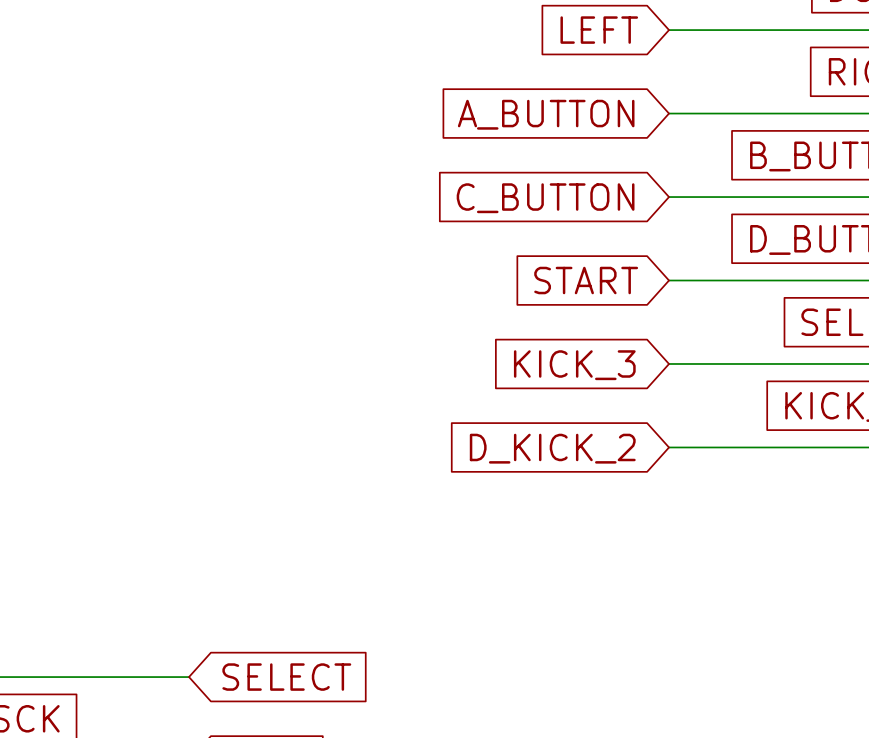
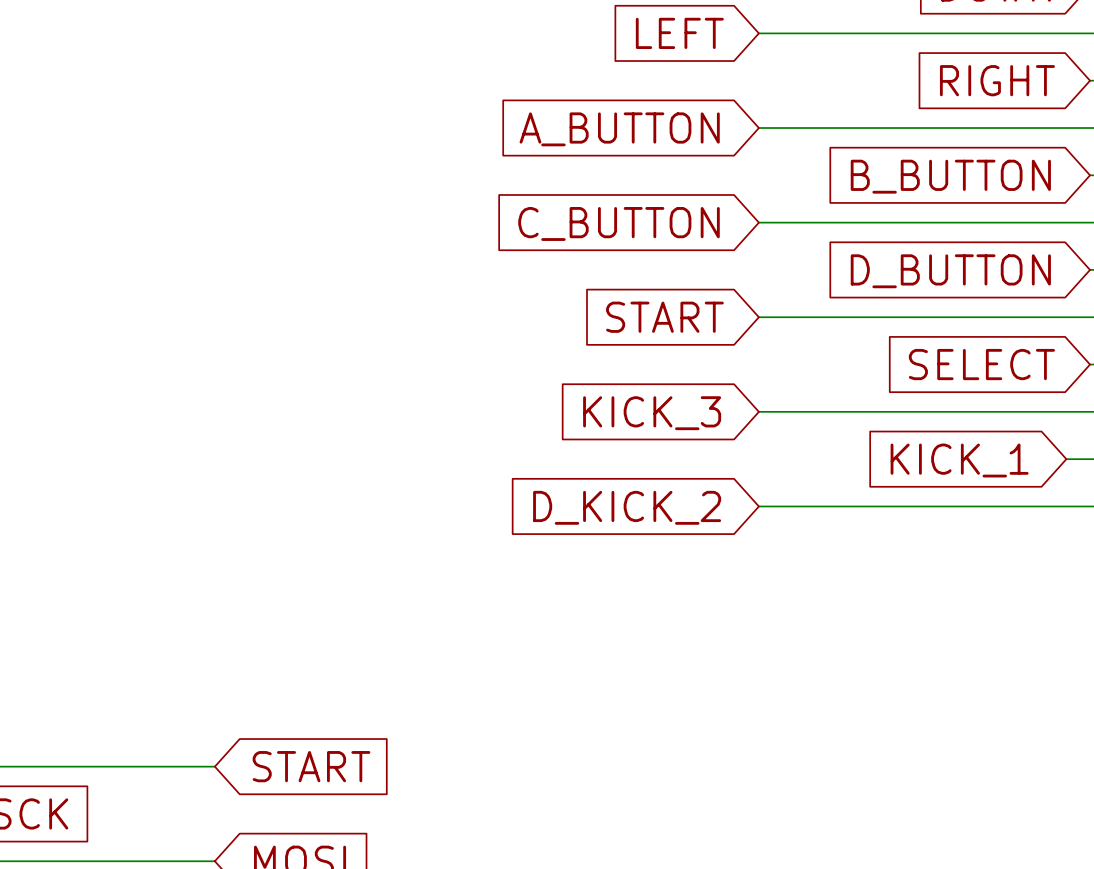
global label: SELECT (286, 677) -> START (311, 766)

